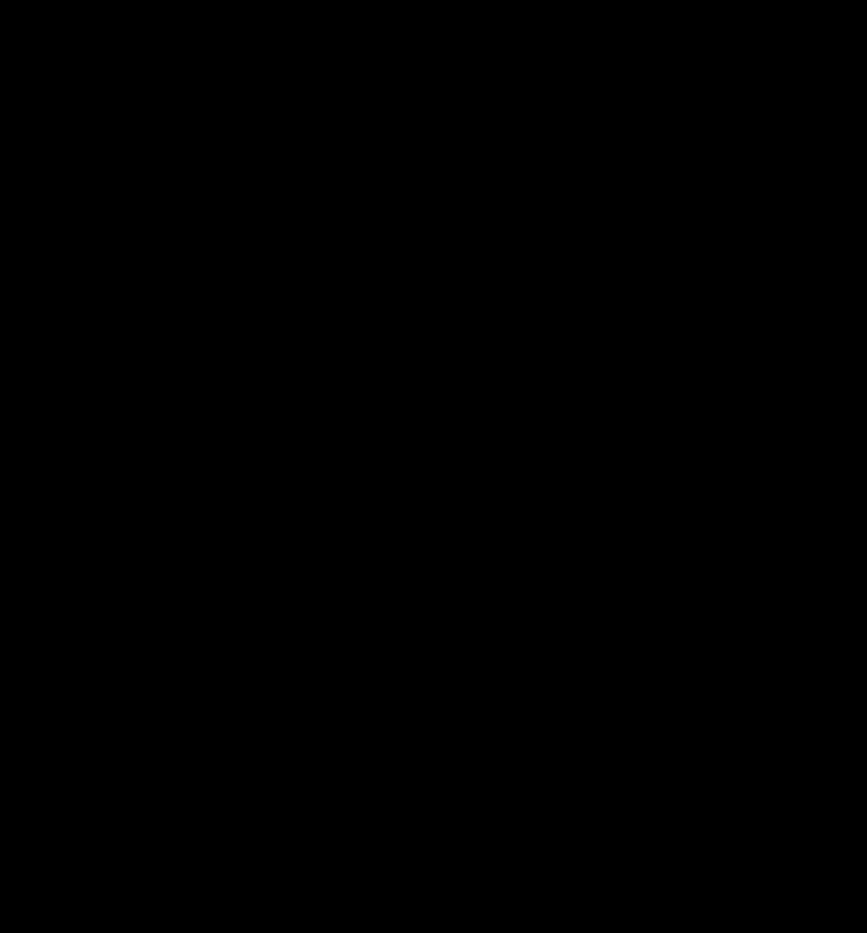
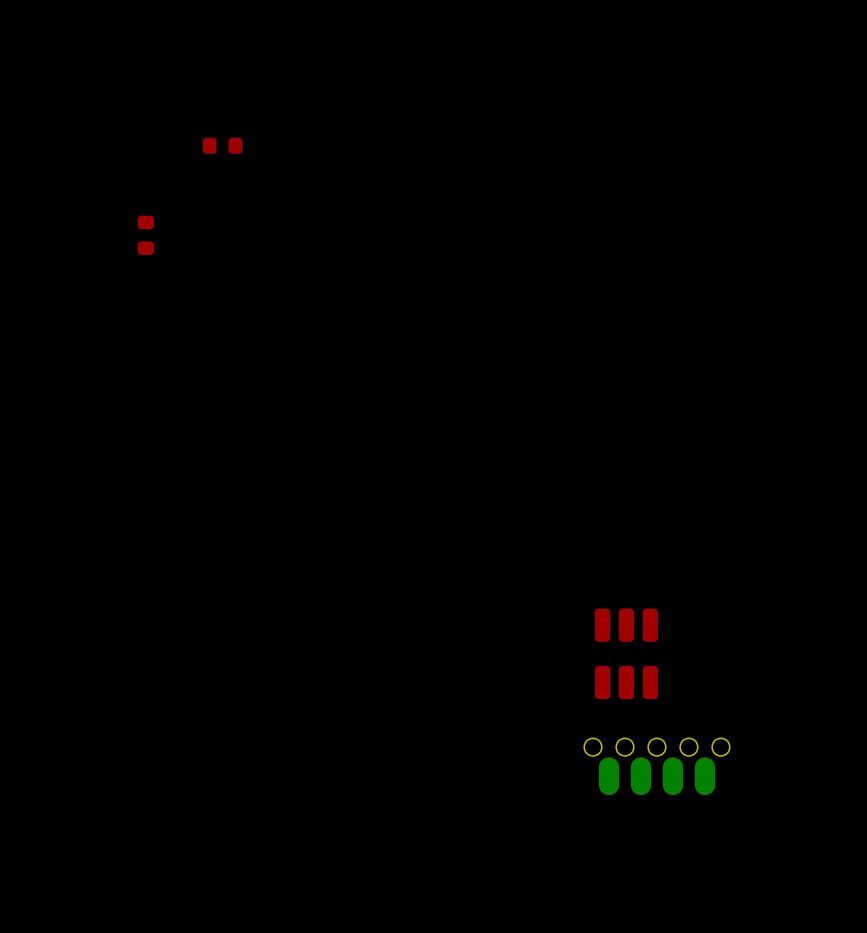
part: none -> (222, 145)
part: none -> (145, 235)
part: none -> (626, 653)
part: none -> (656, 766)

